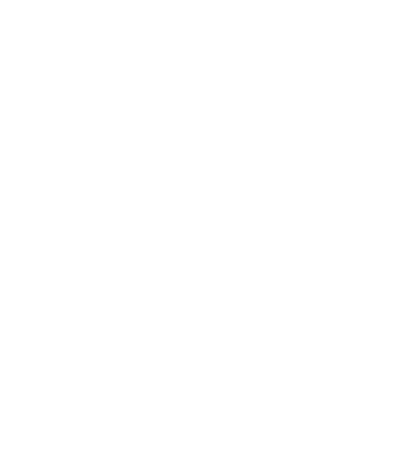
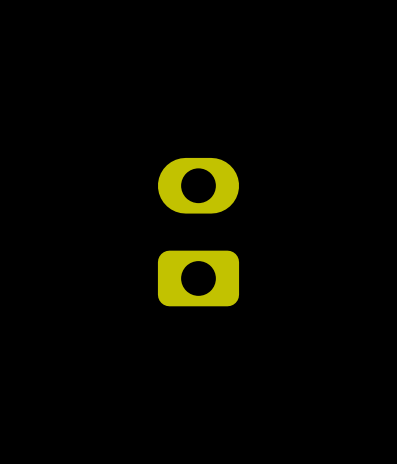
part: none -> (198, 232)

